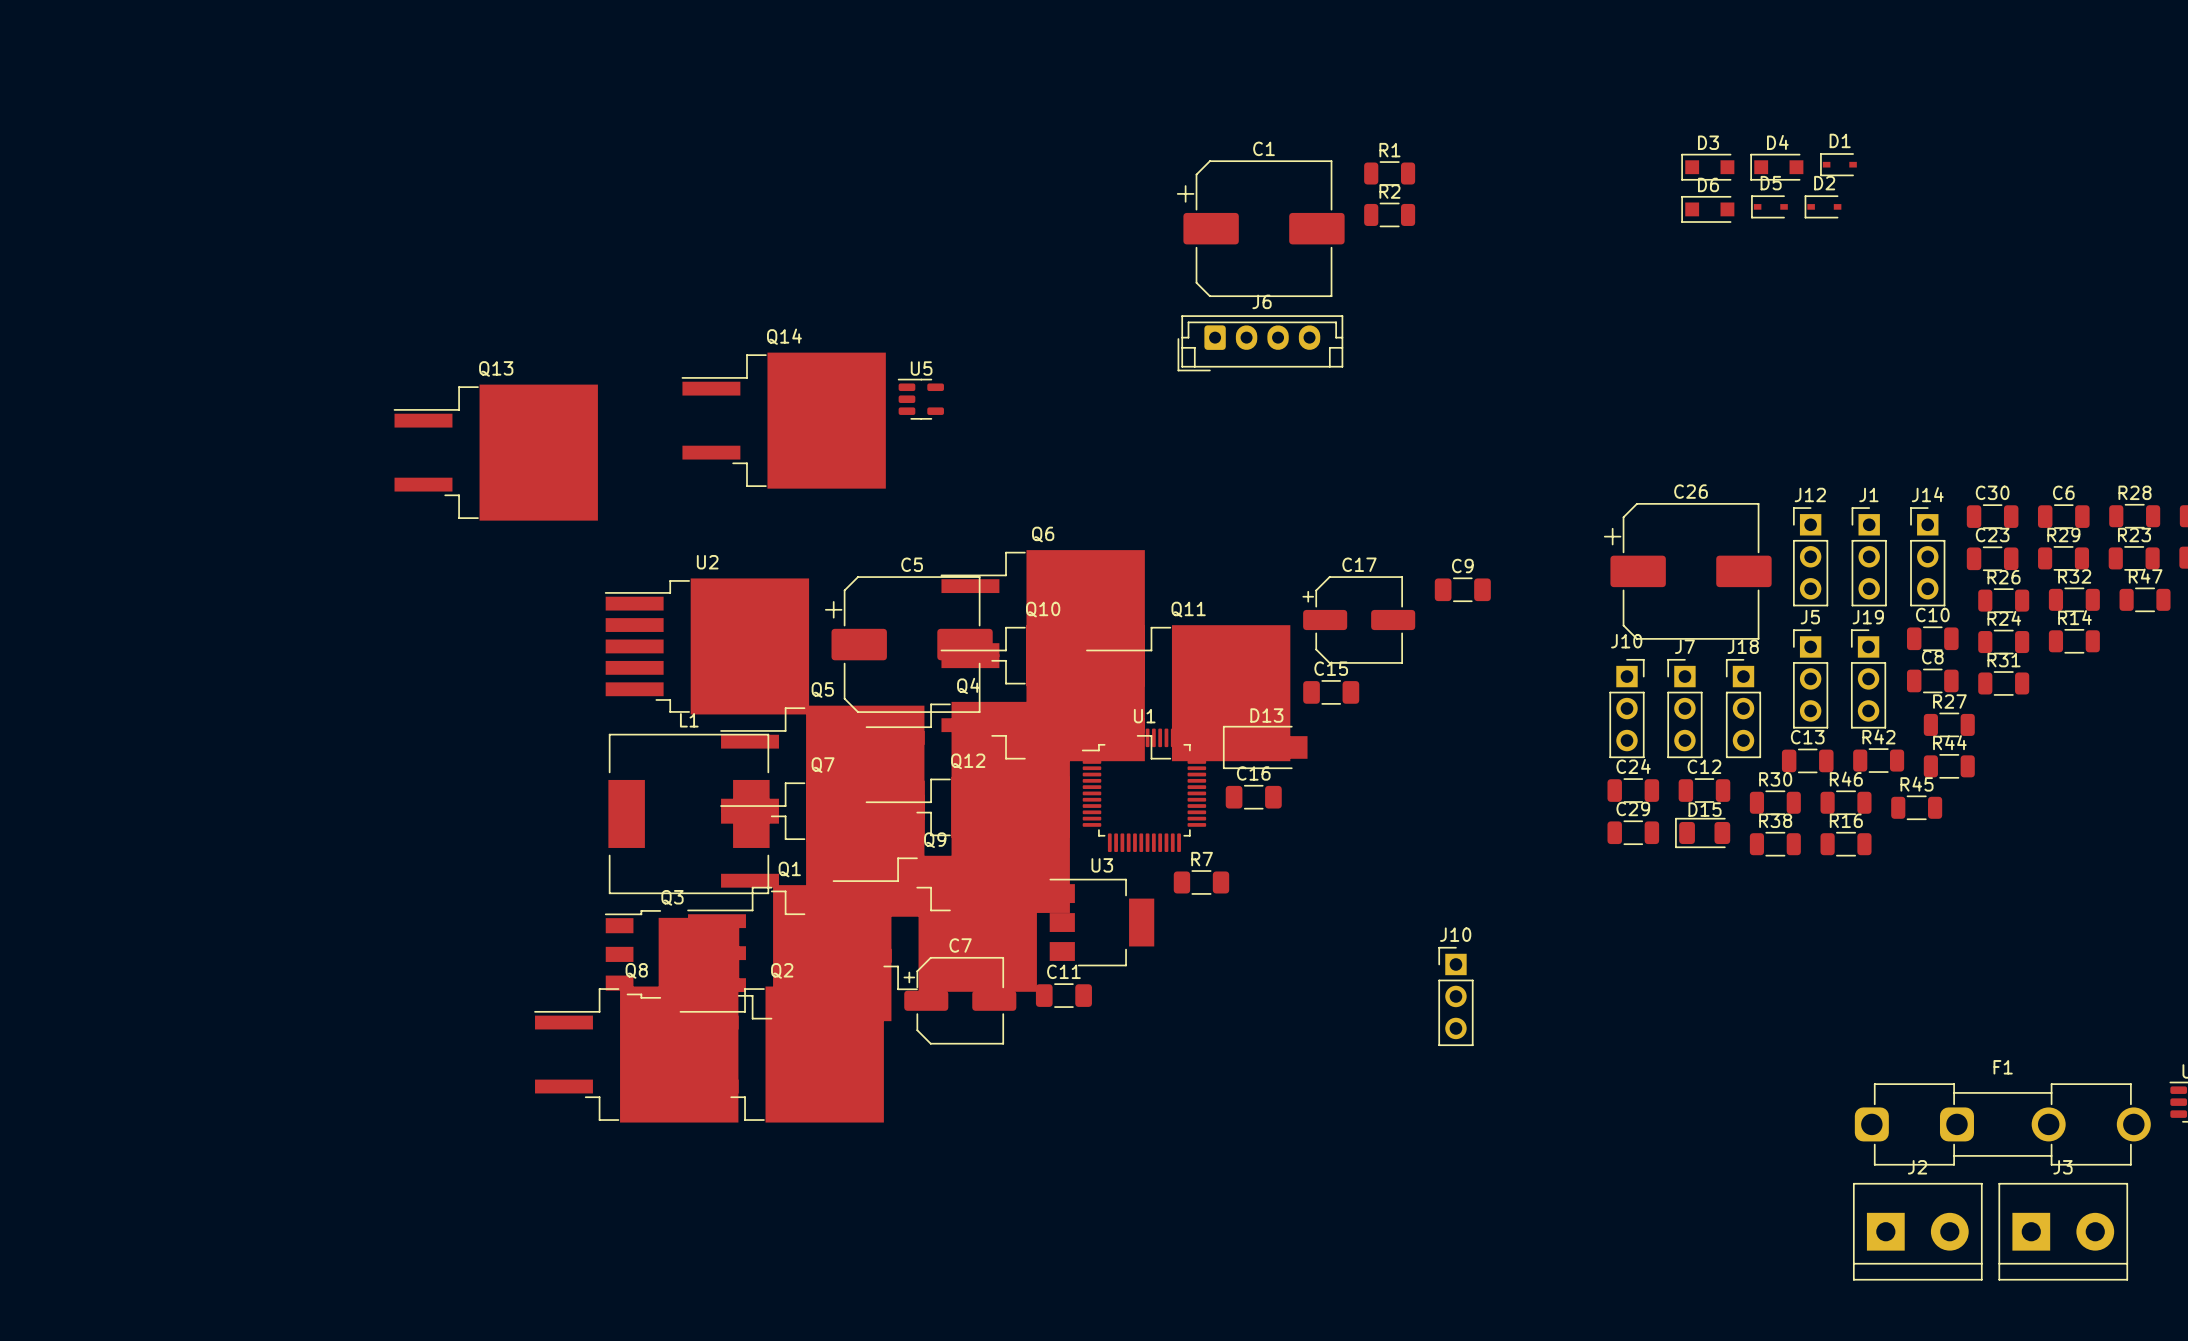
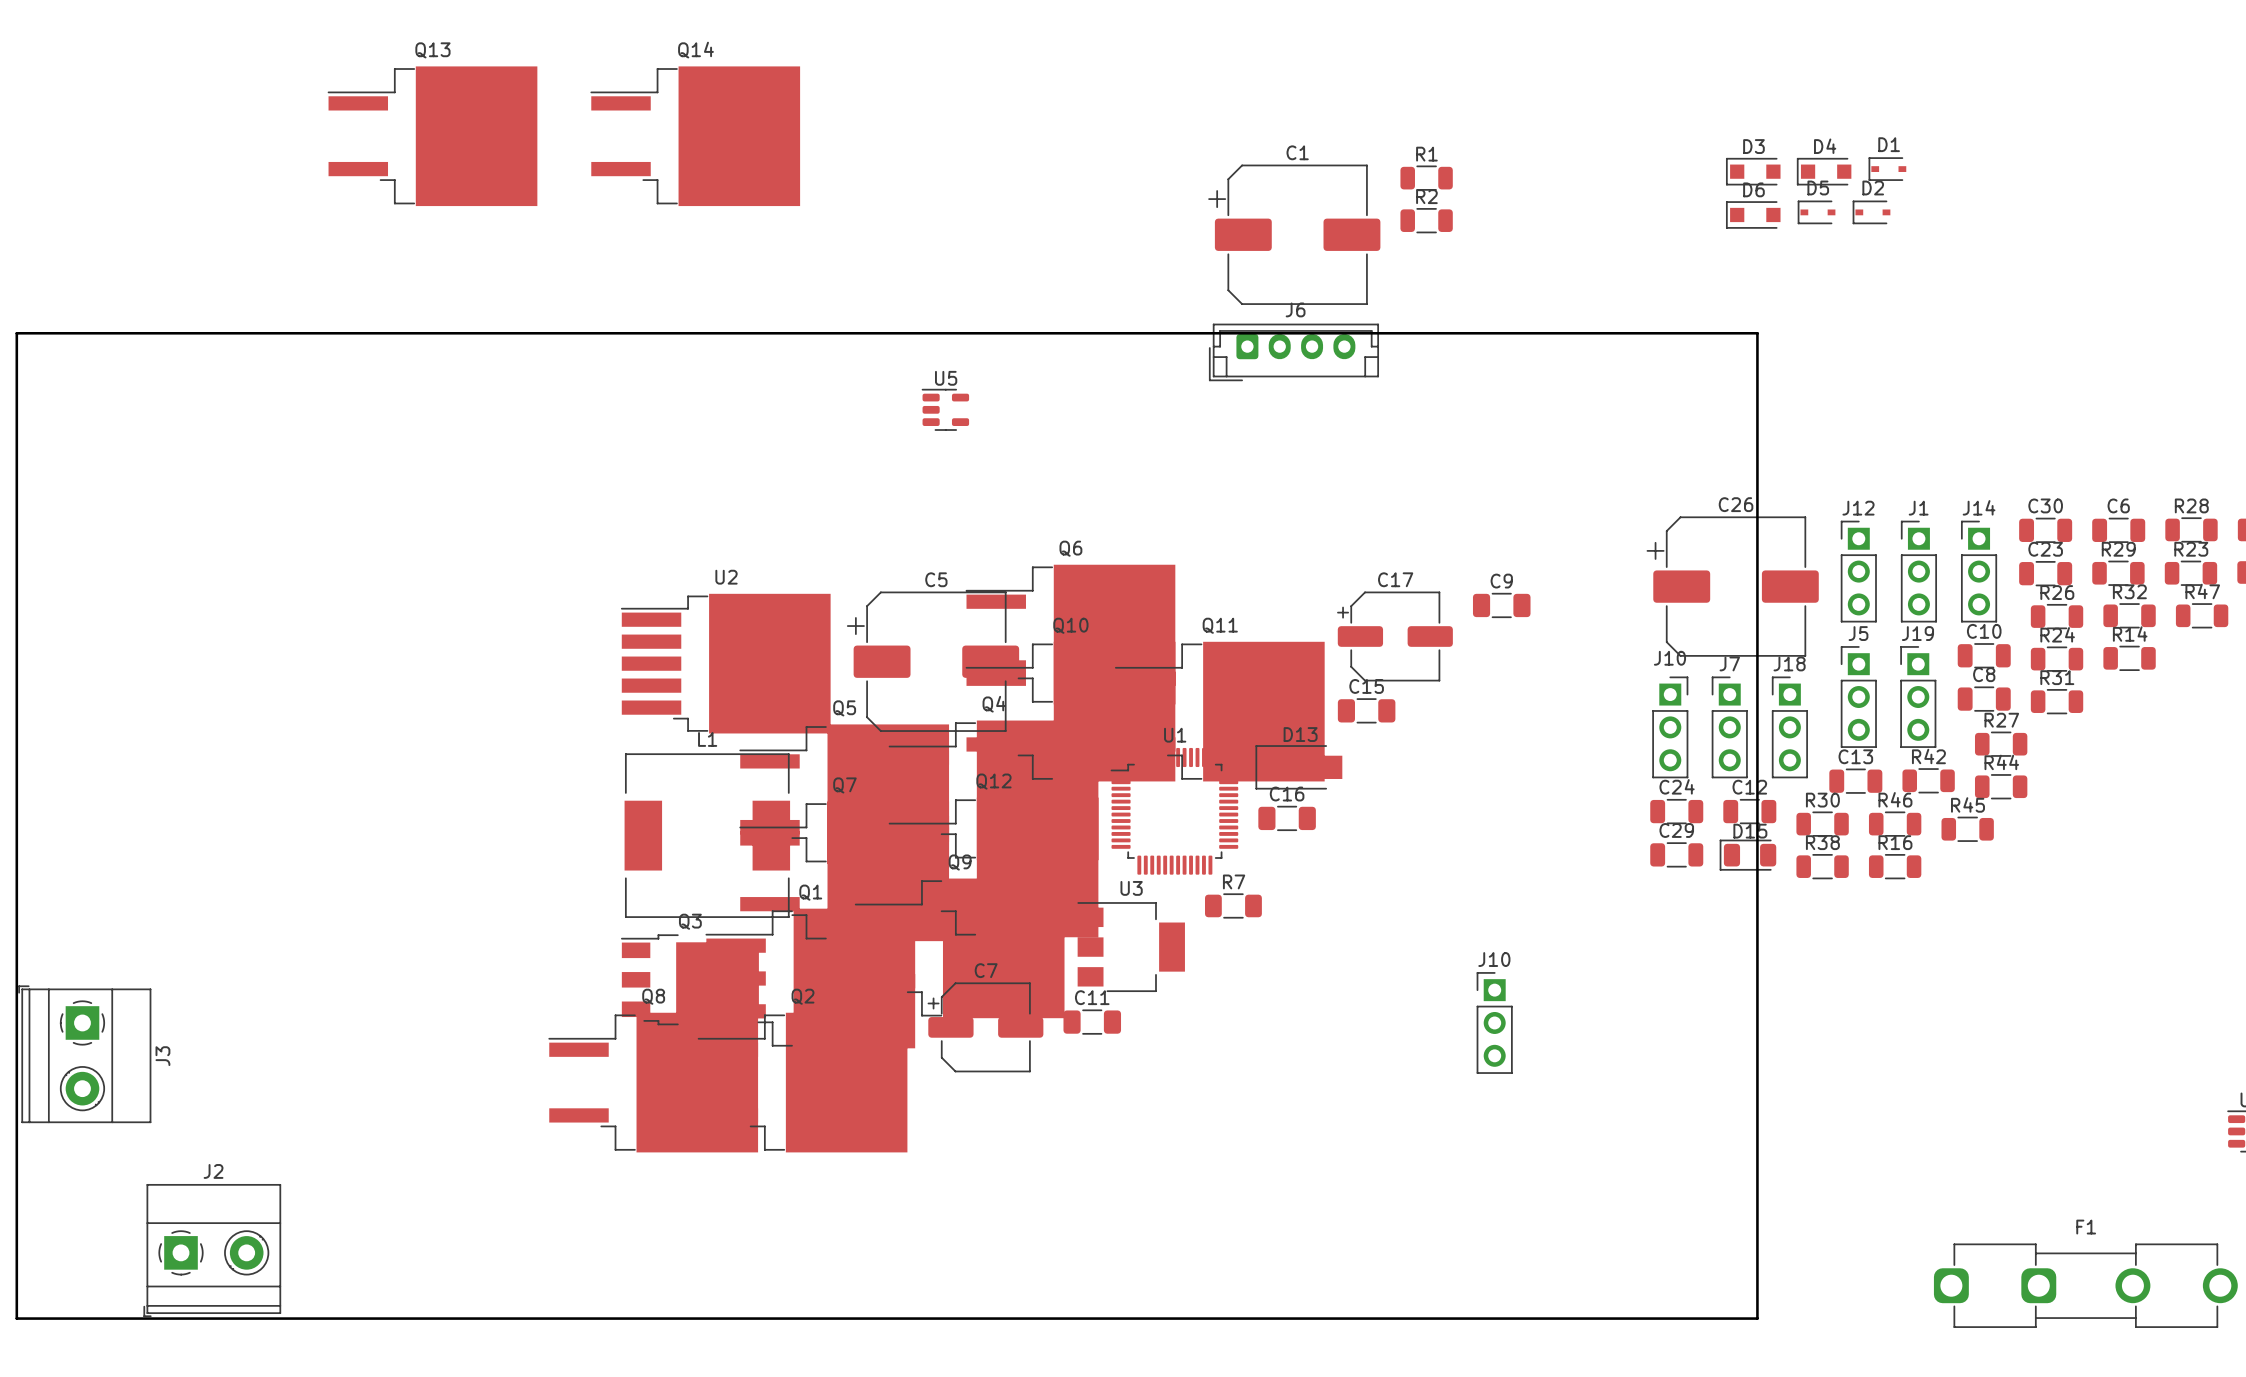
board edge: none -> (16, 333) (1757, 333) (1757, 1318) (16, 1318) (16, 333)
Q14 position: (783, 420) -> (695, 136)
Q13 position: (495, 452) -> (432, 136)
F1 position: (2002, 1124) -> (2085, 1285)
J3 name position: J3 (2062, 1167) -> J3 (162, 1056)
J2 footprint: [1853, 1182, 1983, 1281] -> [143, 1184, 282, 1318]
J3 footprint: [1998, 1182, 2129, 1281] -> [18, 985, 152, 1124]

